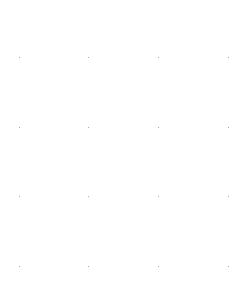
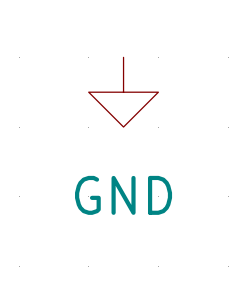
power symbol: none -> GND (123, 92)

